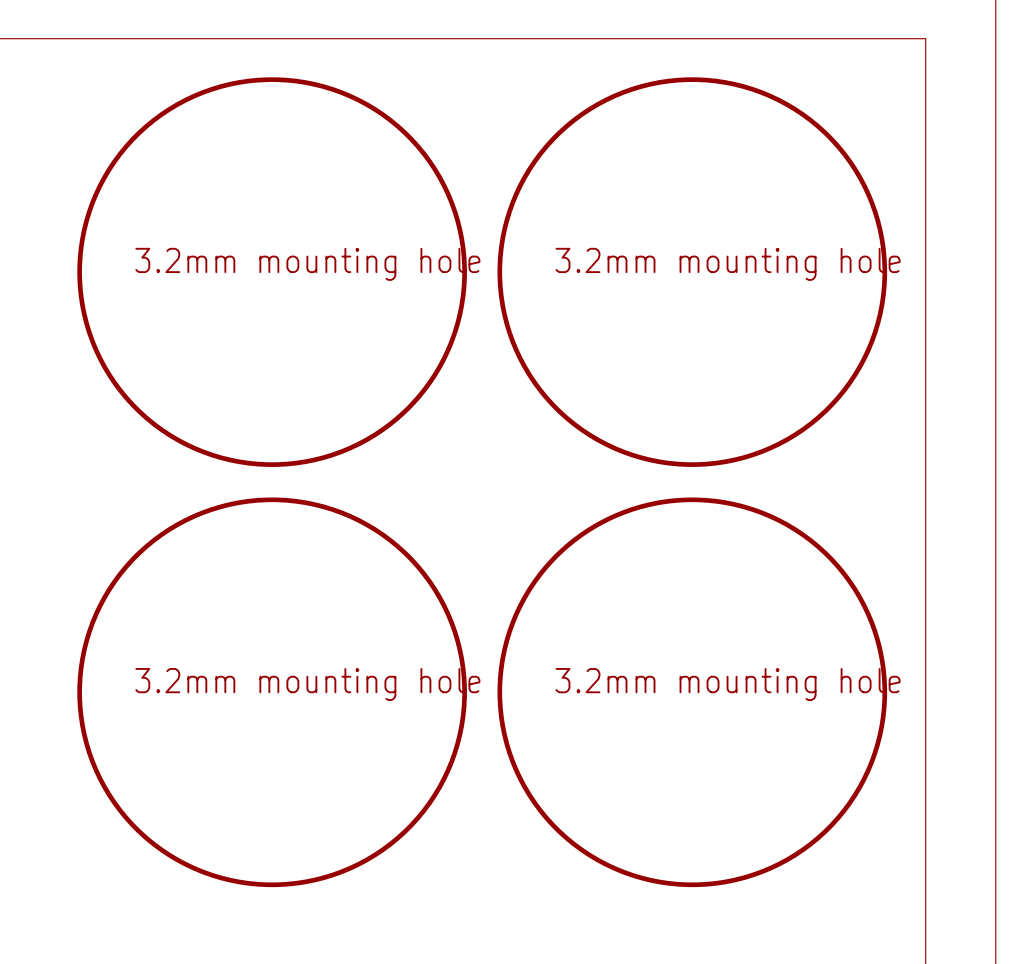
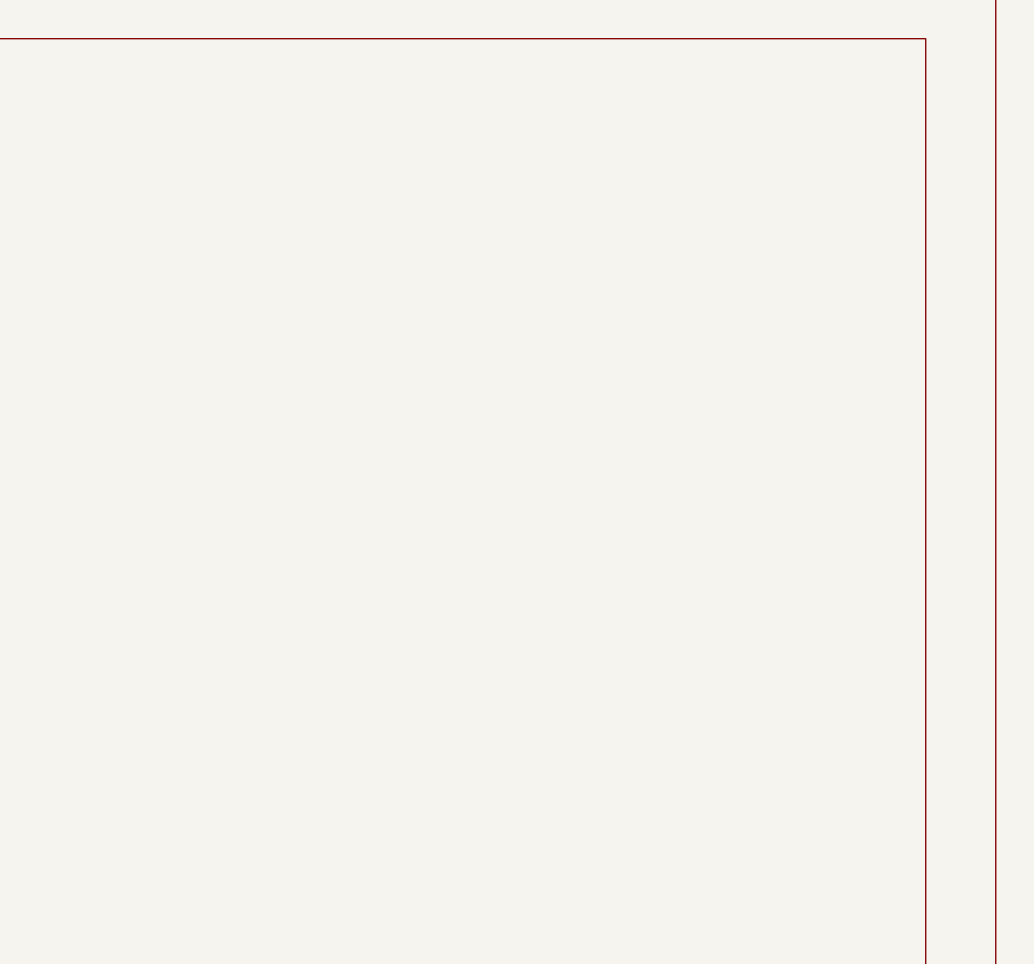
part: (272, 272) -> none
part: (692, 272) -> none
part: (272, 692) -> none
part: (692, 692) -> none

